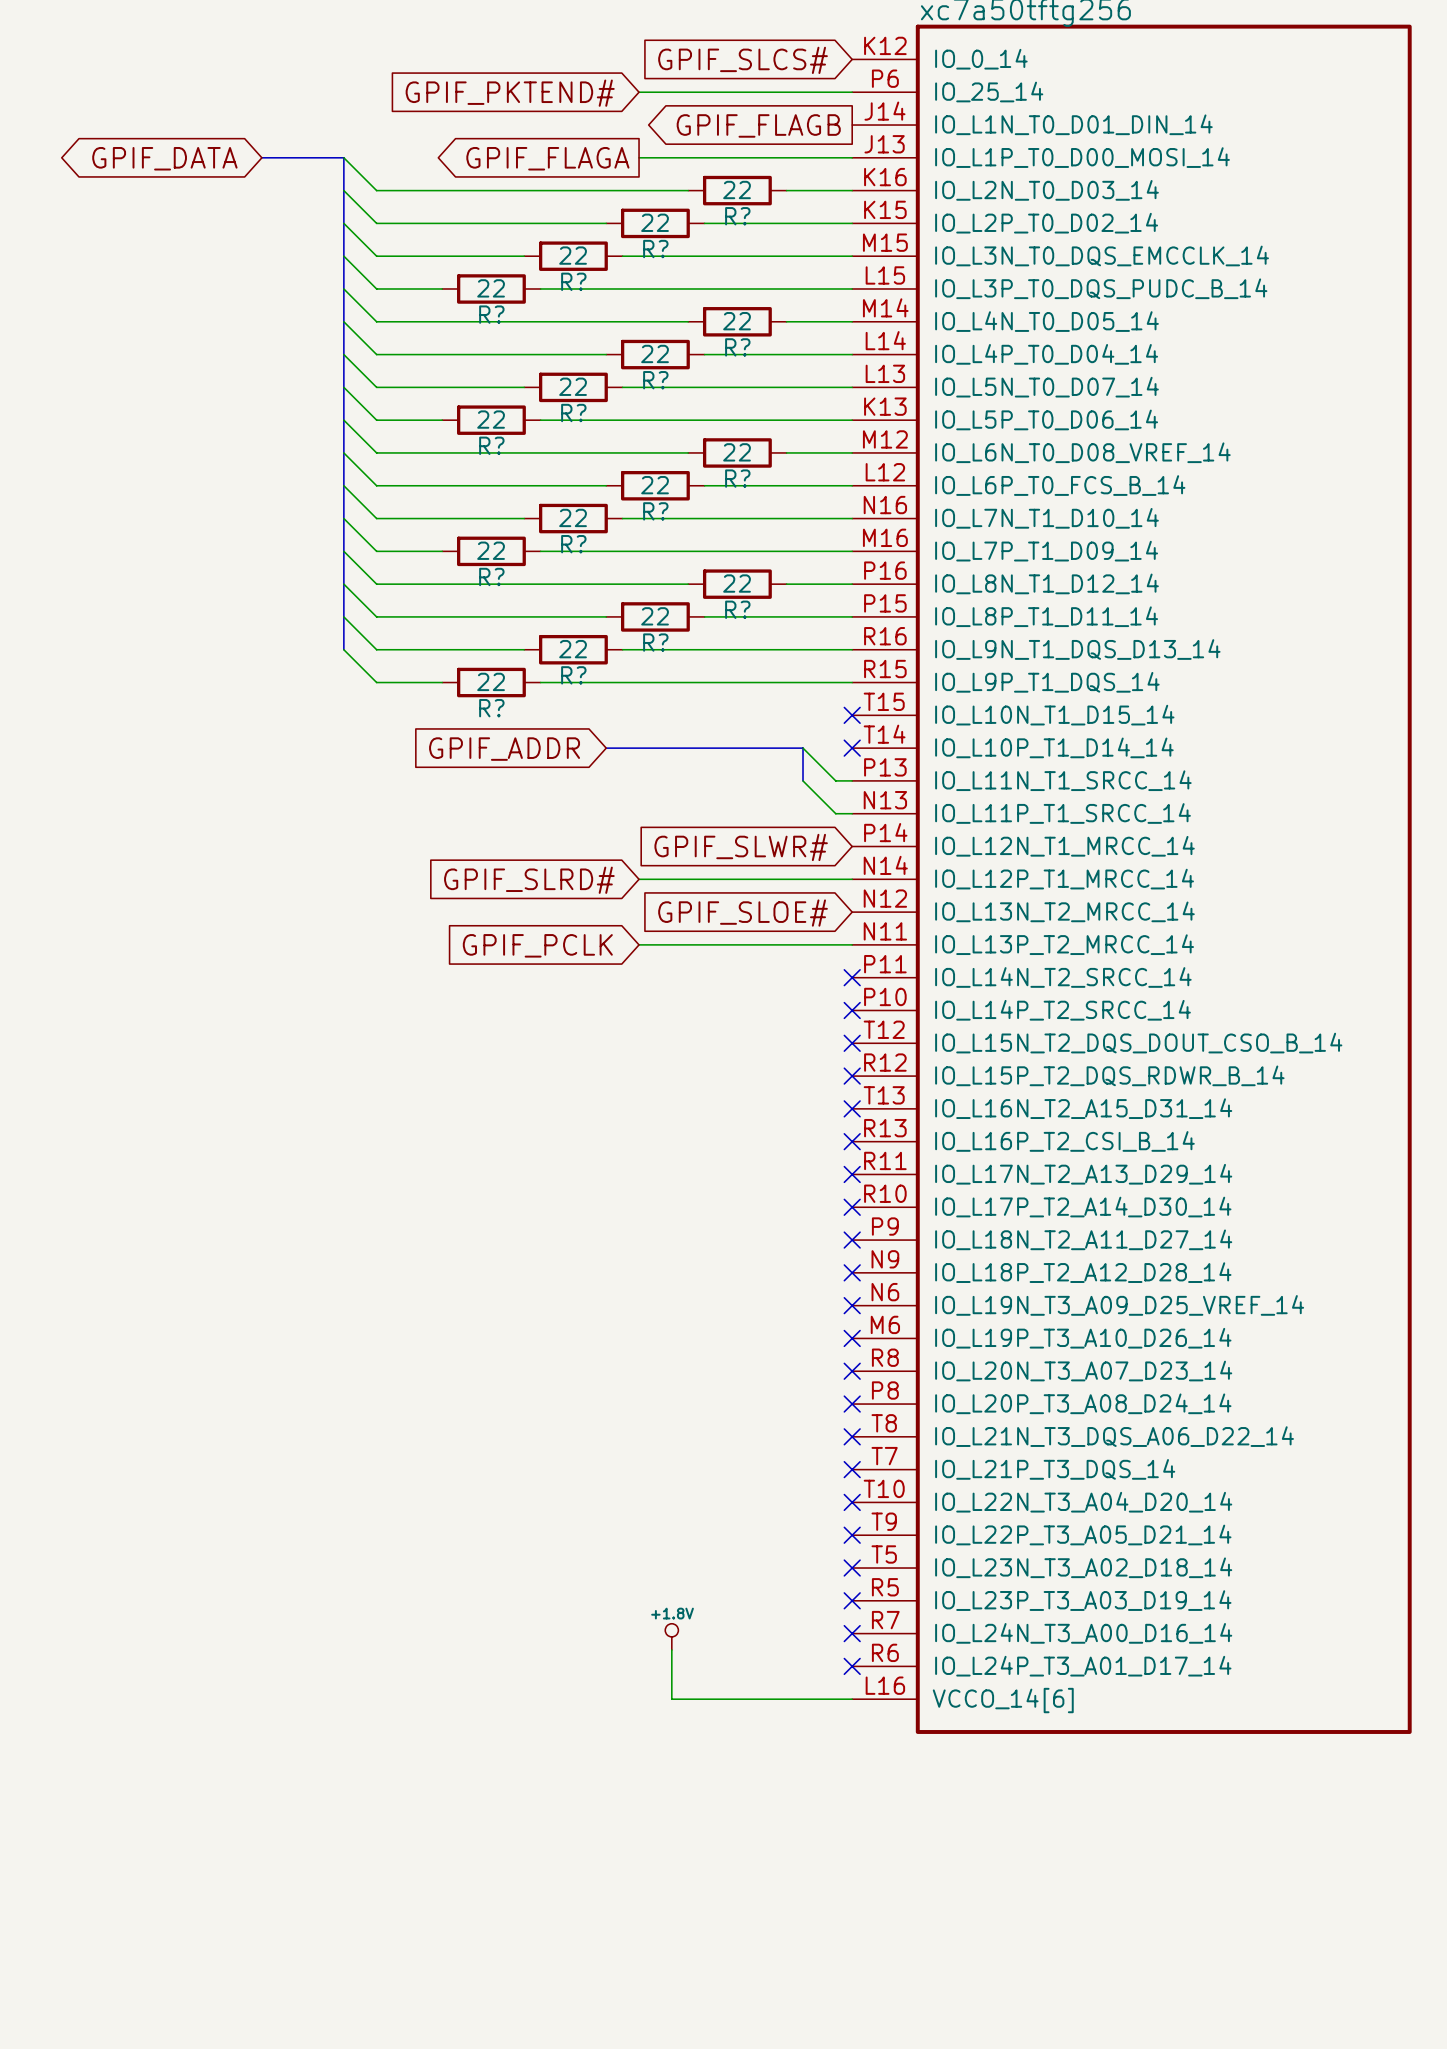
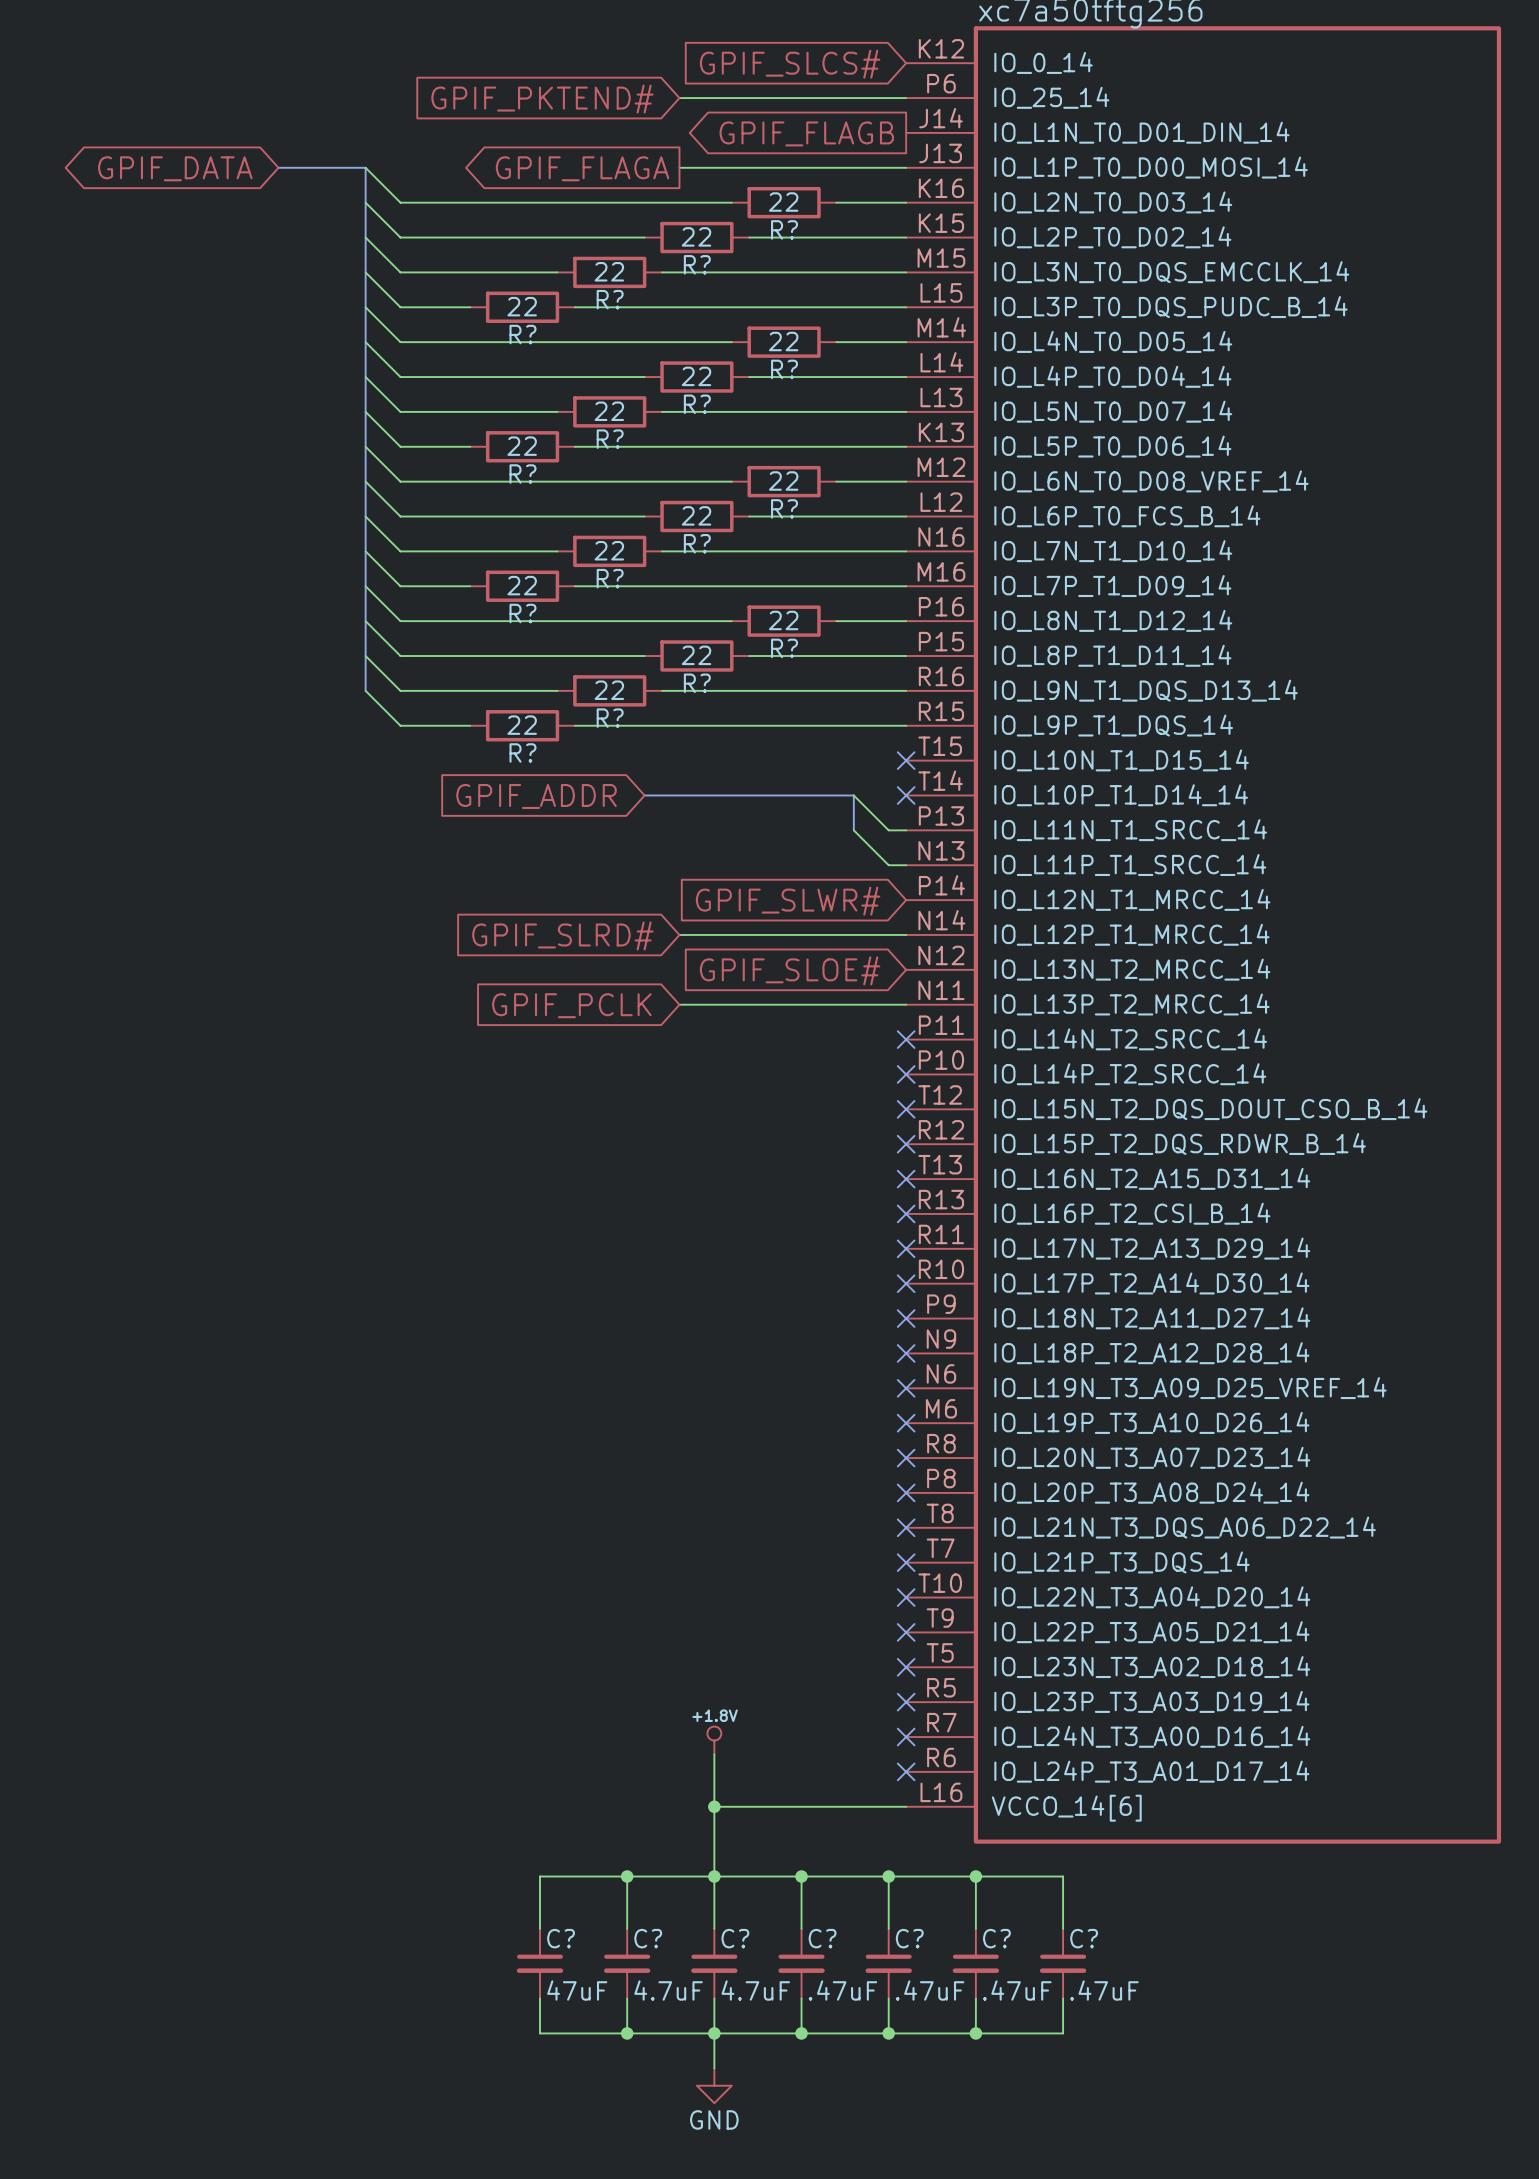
wire: none -> (714, 1806) (714, 1928)
junction: none -> (714, 1806)
wire: none -> (627, 1876) (627, 1928)
junction: none -> (627, 1876)
junction: none -> (714, 1876)
wire: none -> (801, 1876) (801, 1928)
junction: none -> (801, 1876)
wire: none -> (888, 1876) (888, 1928)
junction: none -> (888, 1876)
wire: none -> (975, 1876) (975, 1928)
junction: none -> (975, 1876)
wire: none -> (540, 1928) (540, 1876) (1063, 1876) (1063, 1928)
C?: none -> 47uF (540, 1963)
C?: none -> 4.7uF (627, 1963)
C?: none -> 4.7uF (714, 1963)
C?: none -> .47uF (801, 1963)
C?: none -> .47uF (888, 1963)
C?: none -> .47uF (975, 1963)
C?: none -> .47uF (1063, 1963)
wire: none -> (540, 1998) (540, 2033) (1063, 2033) (1063, 1998)
wire: none -> (627, 1998) (627, 2033)
wire: none -> (714, 1998) (714, 2068)
wire: none -> (801, 1998) (801, 2033)
wire: none -> (888, 1998) (888, 2033)
wire: none -> (975, 1998) (975, 2033)
junction: none -> (627, 2033)
junction: none -> (714, 2033)
junction: none -> (801, 2033)
junction: none -> (888, 2033)
junction: none -> (975, 2033)
power symbol: none -> GND (714, 2085)

